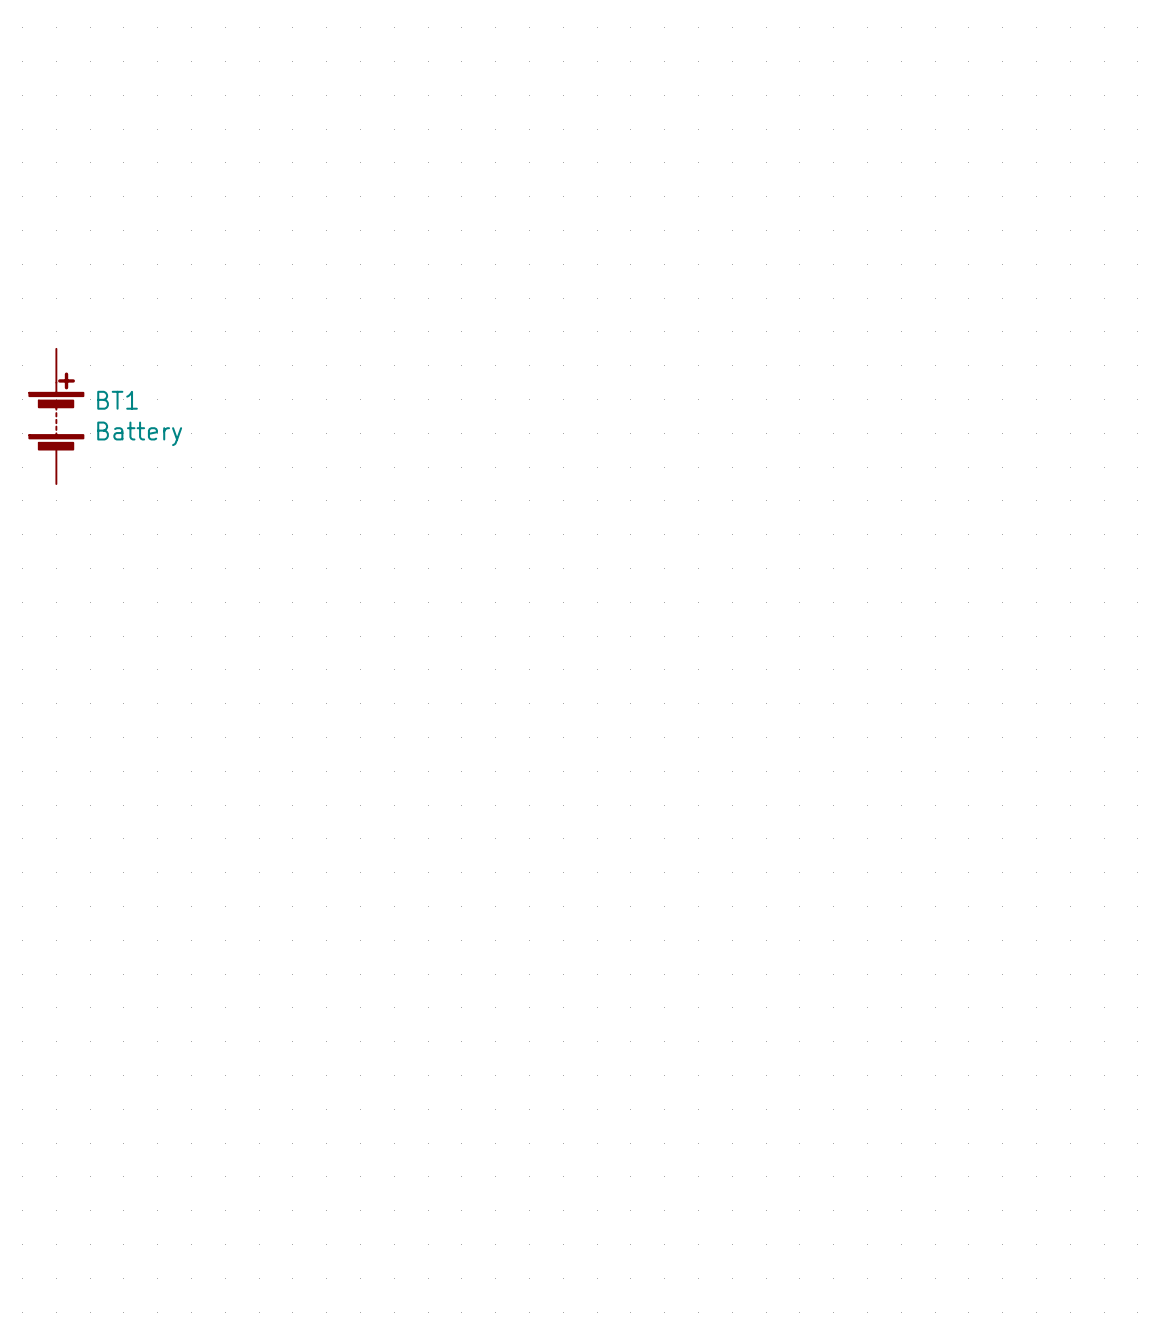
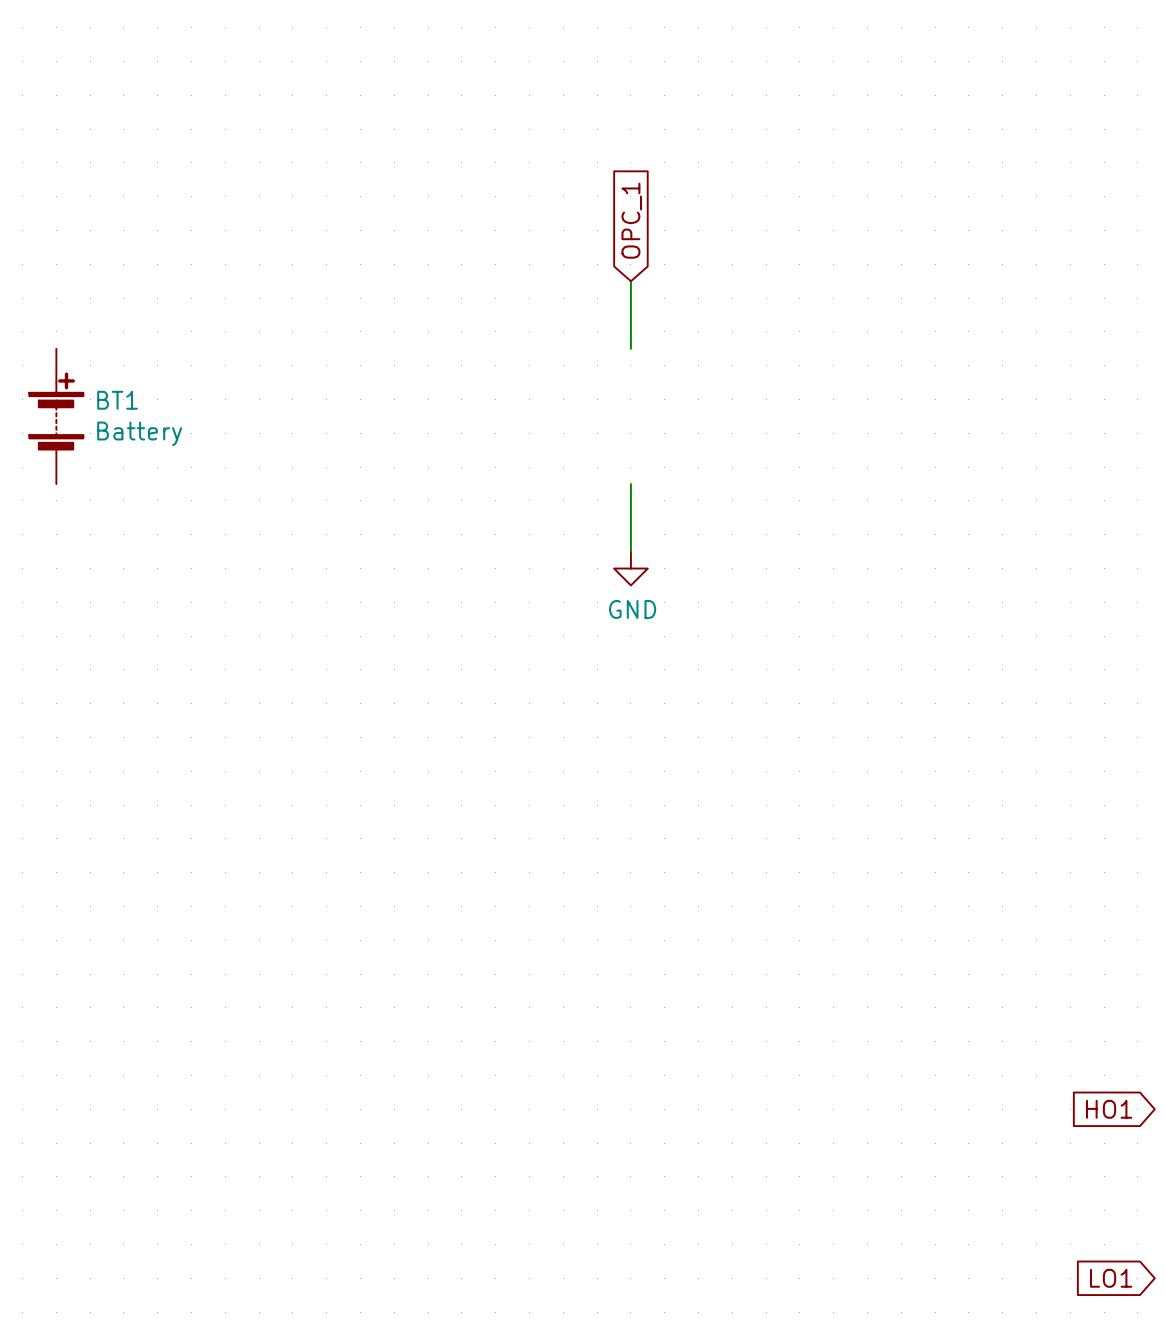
global label: none -> OPC_1 (631, 220)
wire: none -> (630, 281) (630, 348)
wire: none -> (630, 484) (630, 551)
power symbol: none -> GND (630, 568)
global label: none -> HO1 (1109, 1109)
global label: none -> LO1 (1111, 1278)

